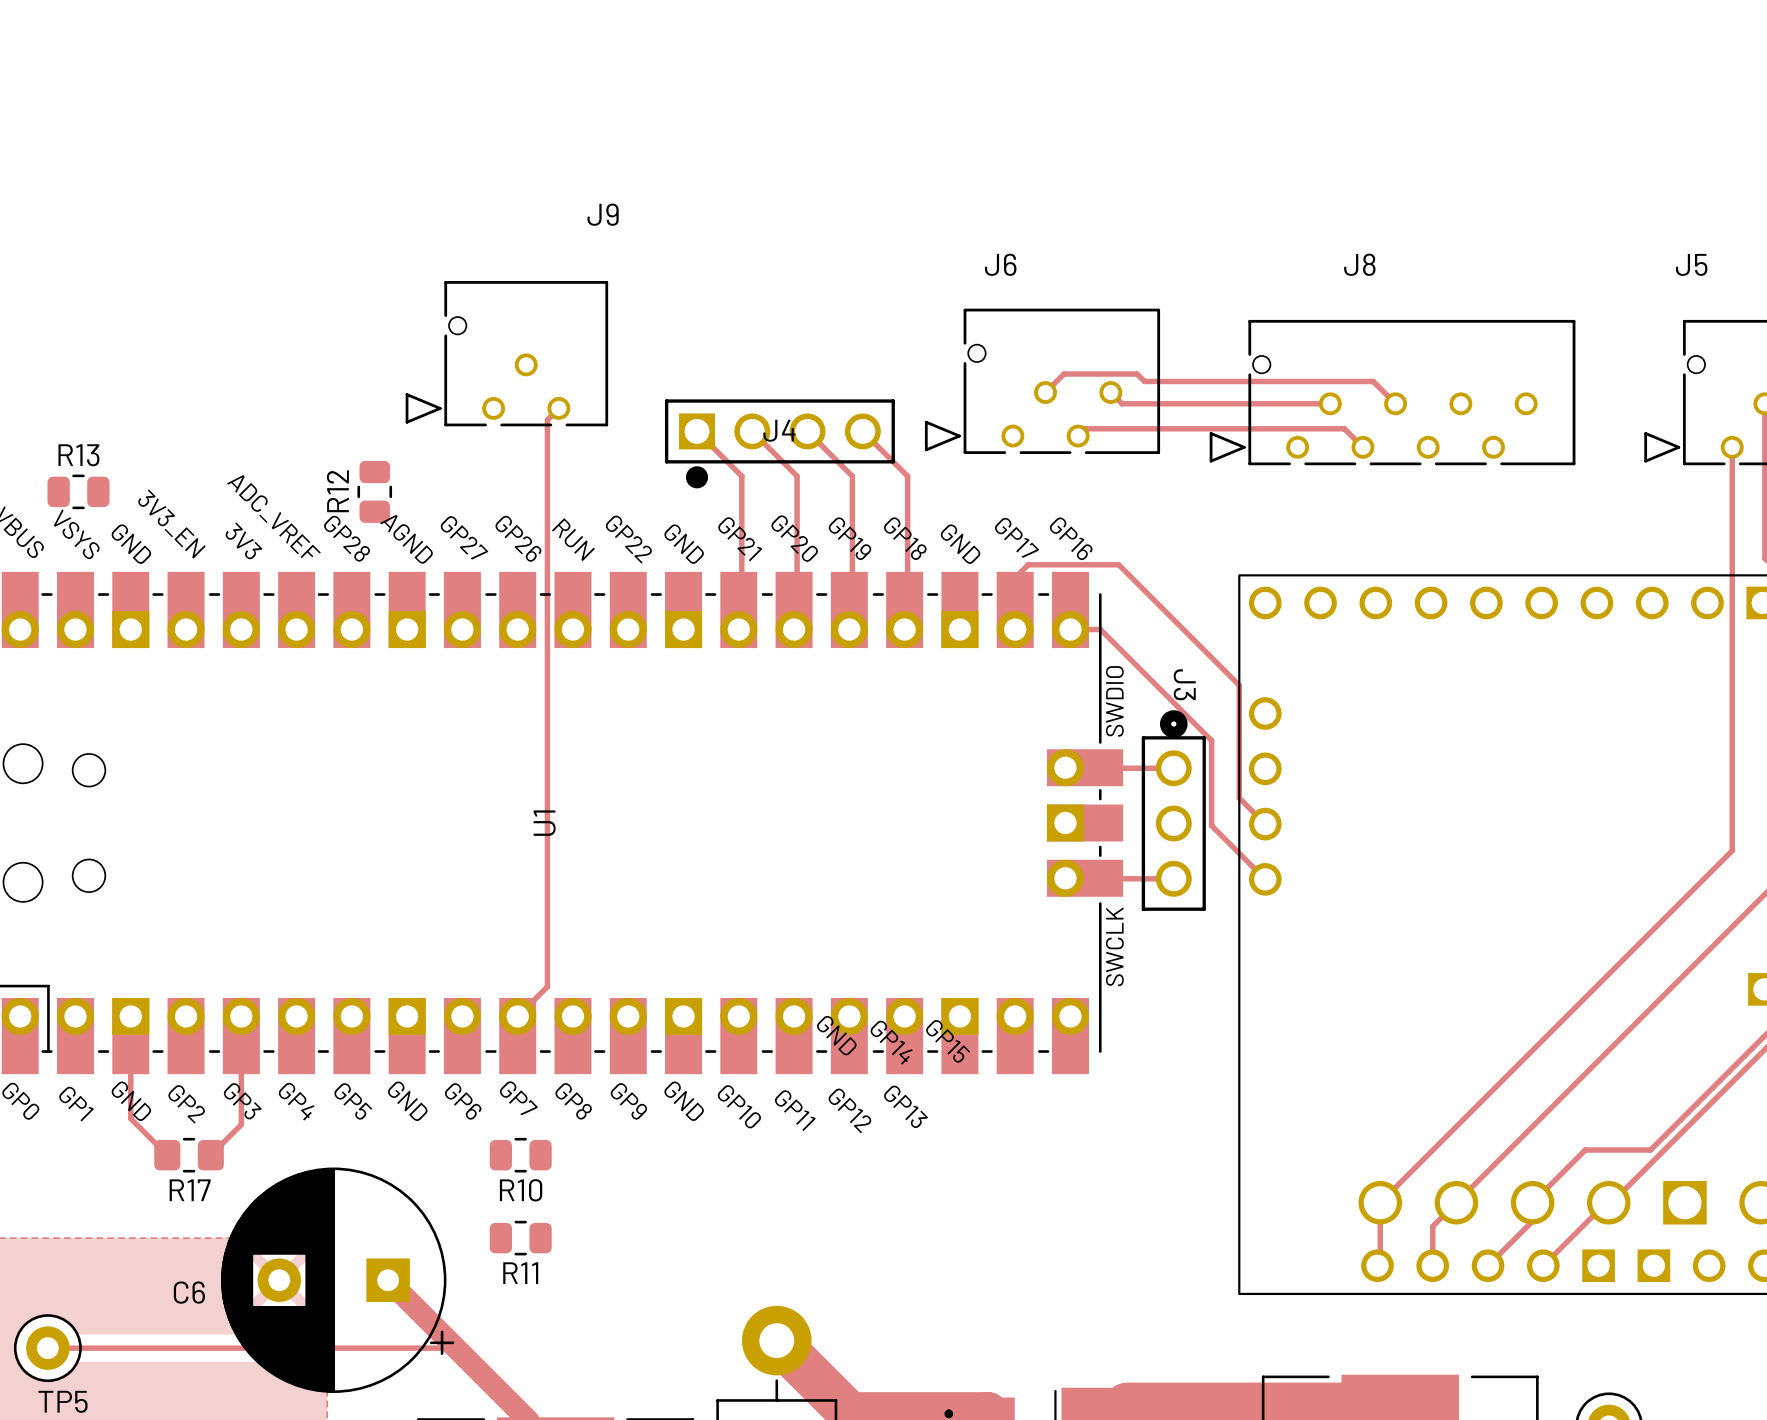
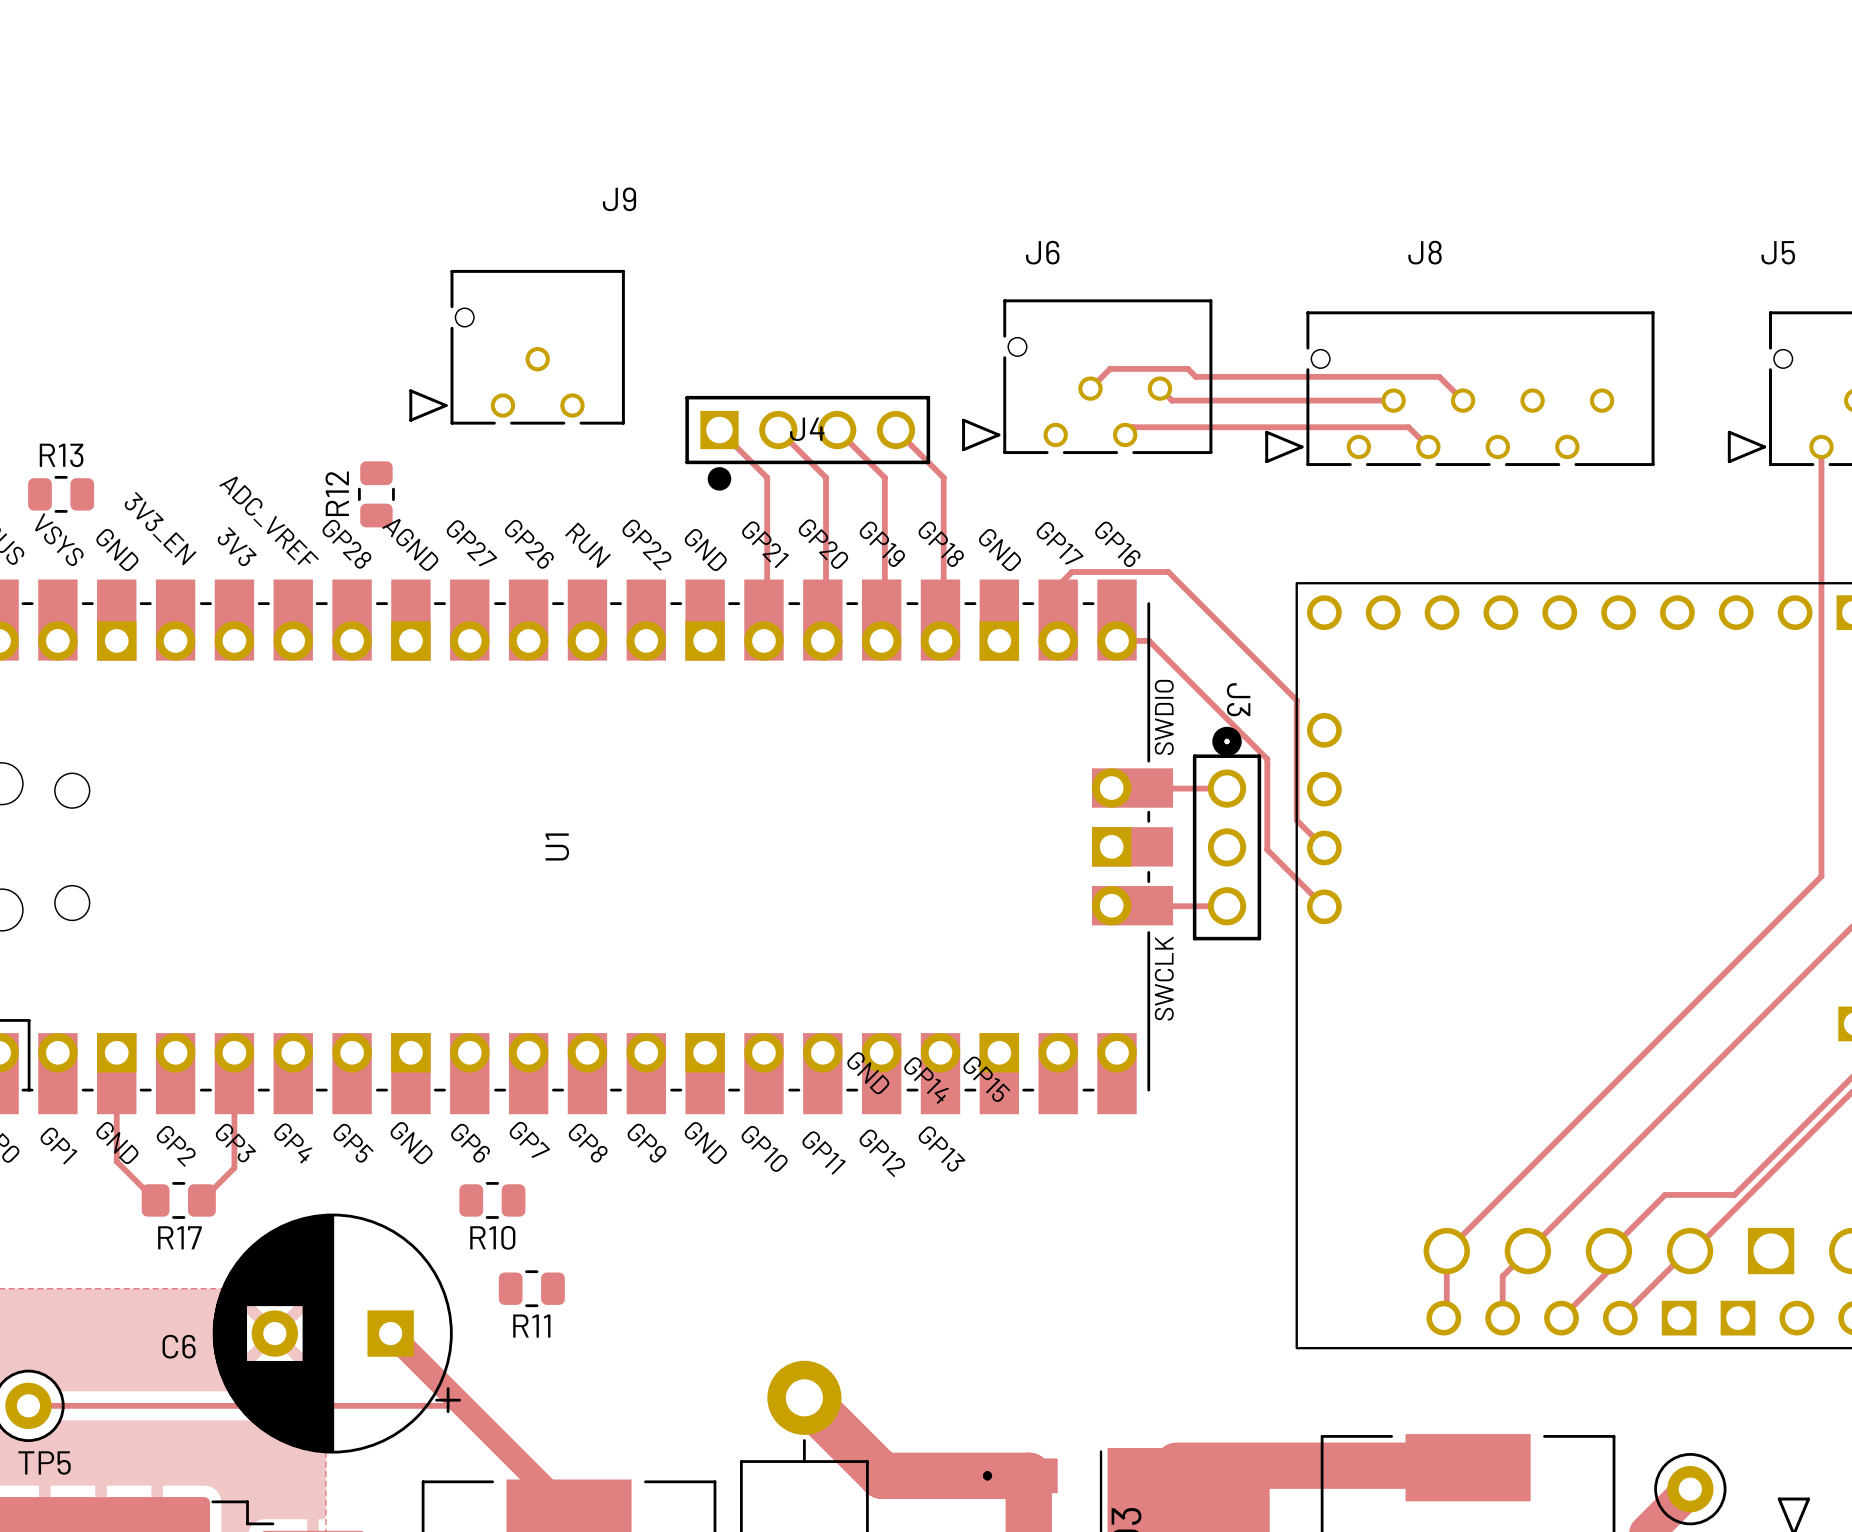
track: (558, 408) (547, 419) (547, 986) (517, 1016) -> none
R10 position: (520, 1155) -> (492, 1200)

